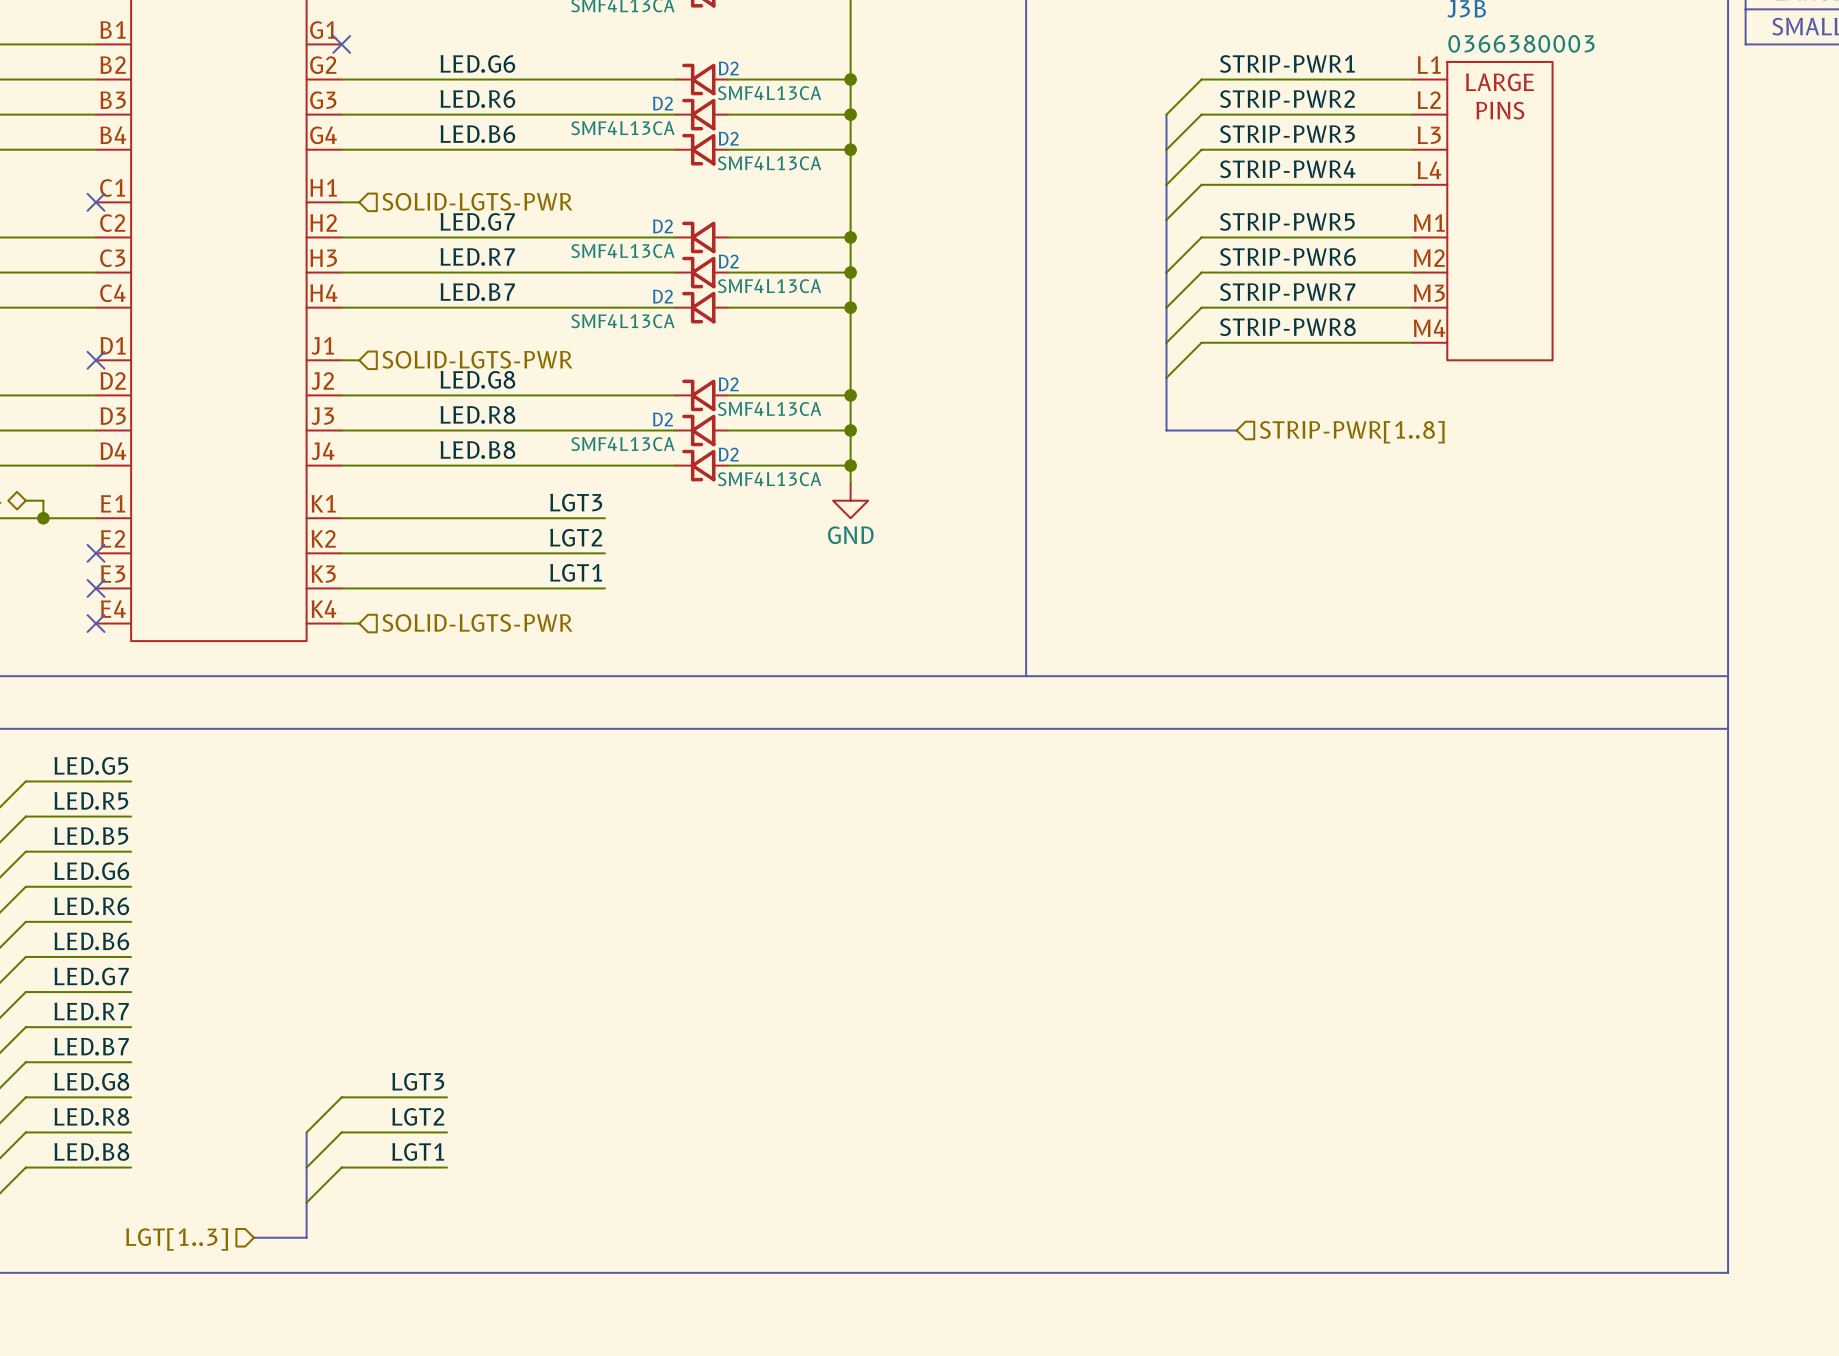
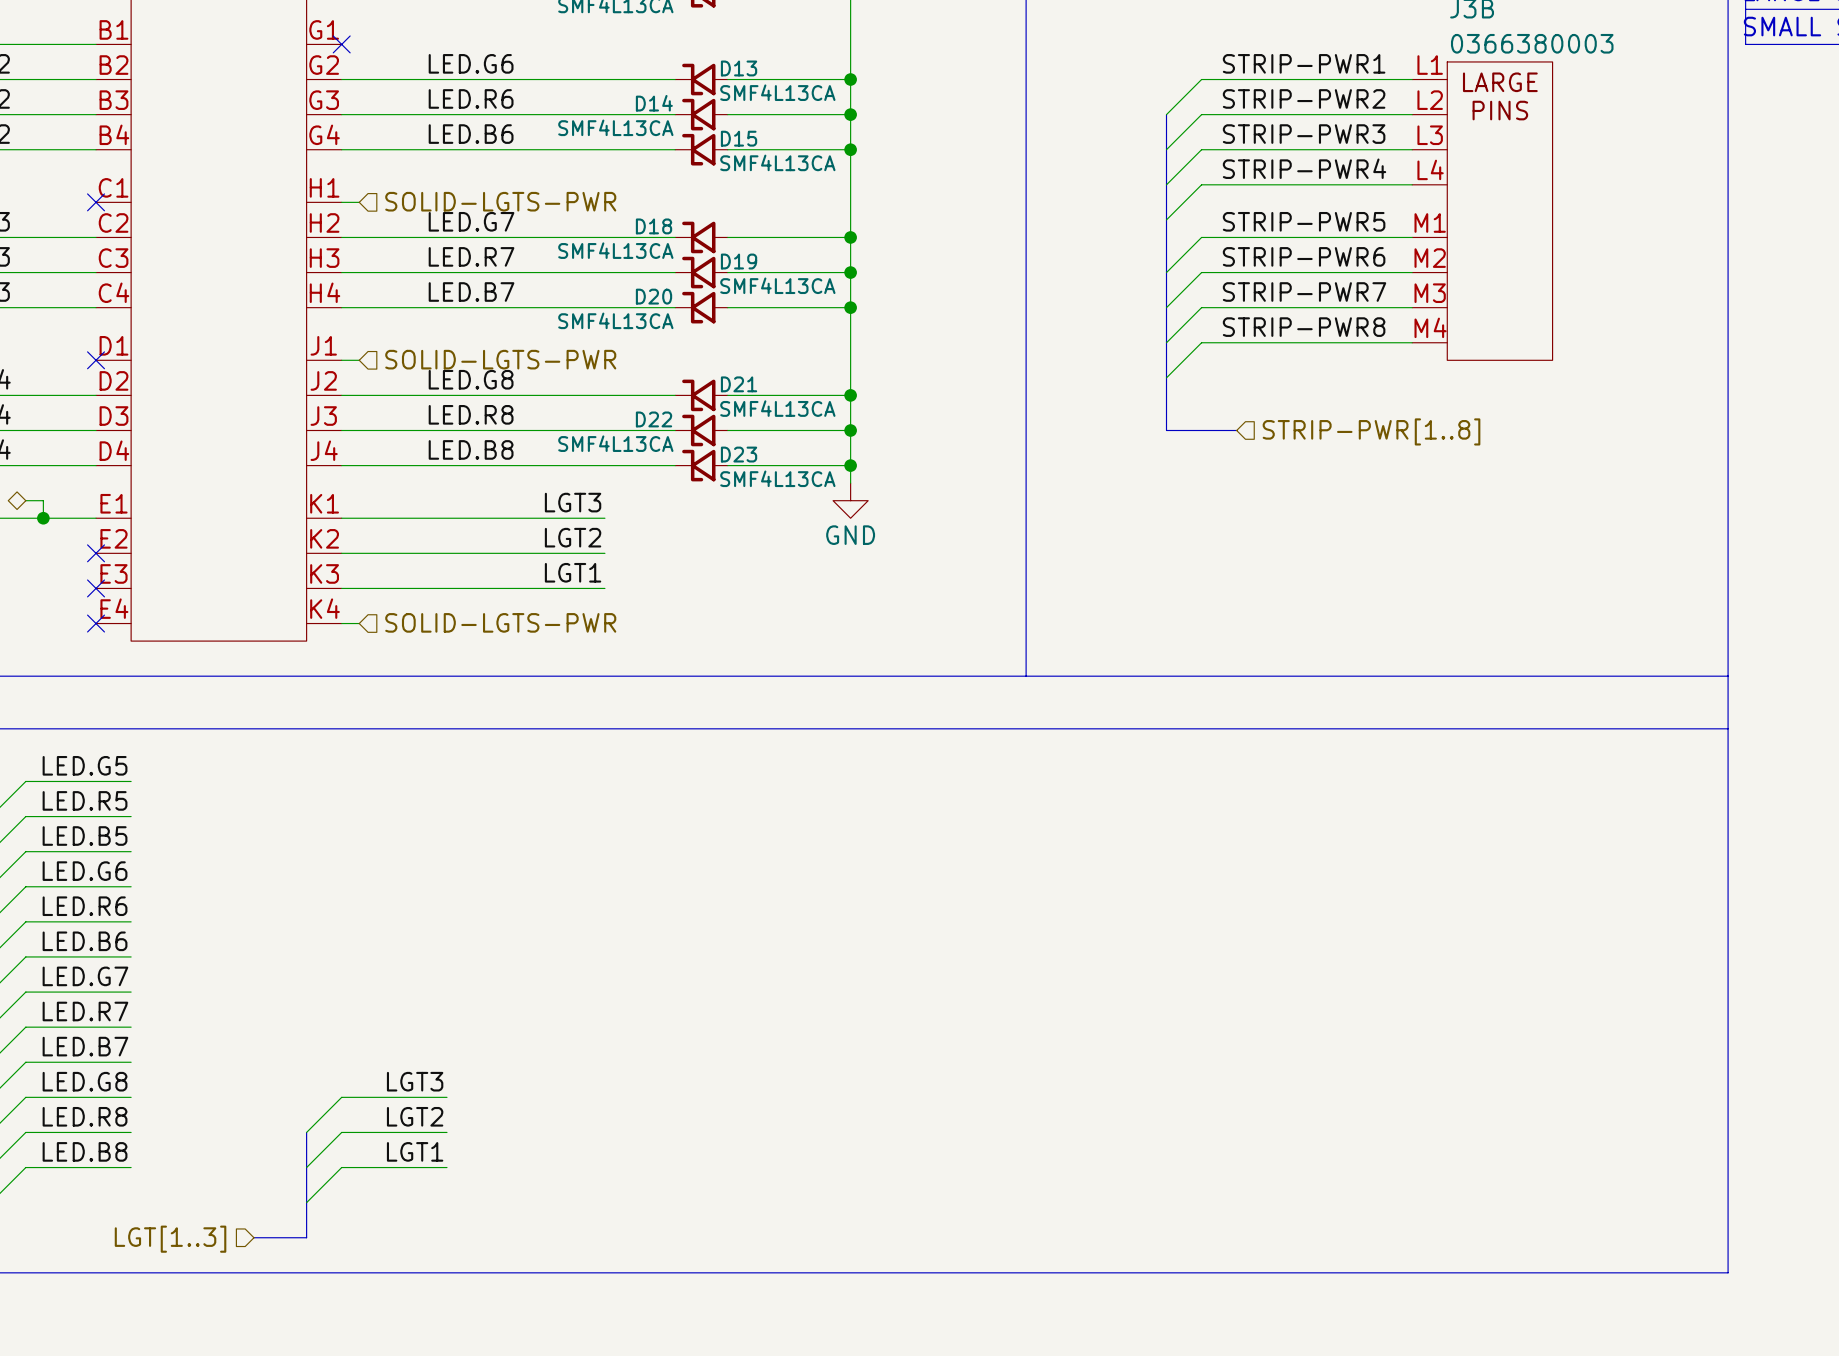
D2 name: D2 (728, 68) -> D13 (739, 68)
D2 name: D2 (662, 103) -> D14 (654, 103)
D2 name: D2 (728, 138) -> D15 (739, 138)
D2 name: D2 (662, 226) -> D18 (654, 226)
D2 name: D2 (728, 261) -> D19 (739, 261)
D2 name: D2 (662, 296) -> D20 (654, 296)
D2 name: D2 (728, 384) -> D21 (739, 384)
D2 name: D2 (662, 419) -> D22 (654, 419)
D2 name: D2 (728, 454) -> D23 (739, 454)

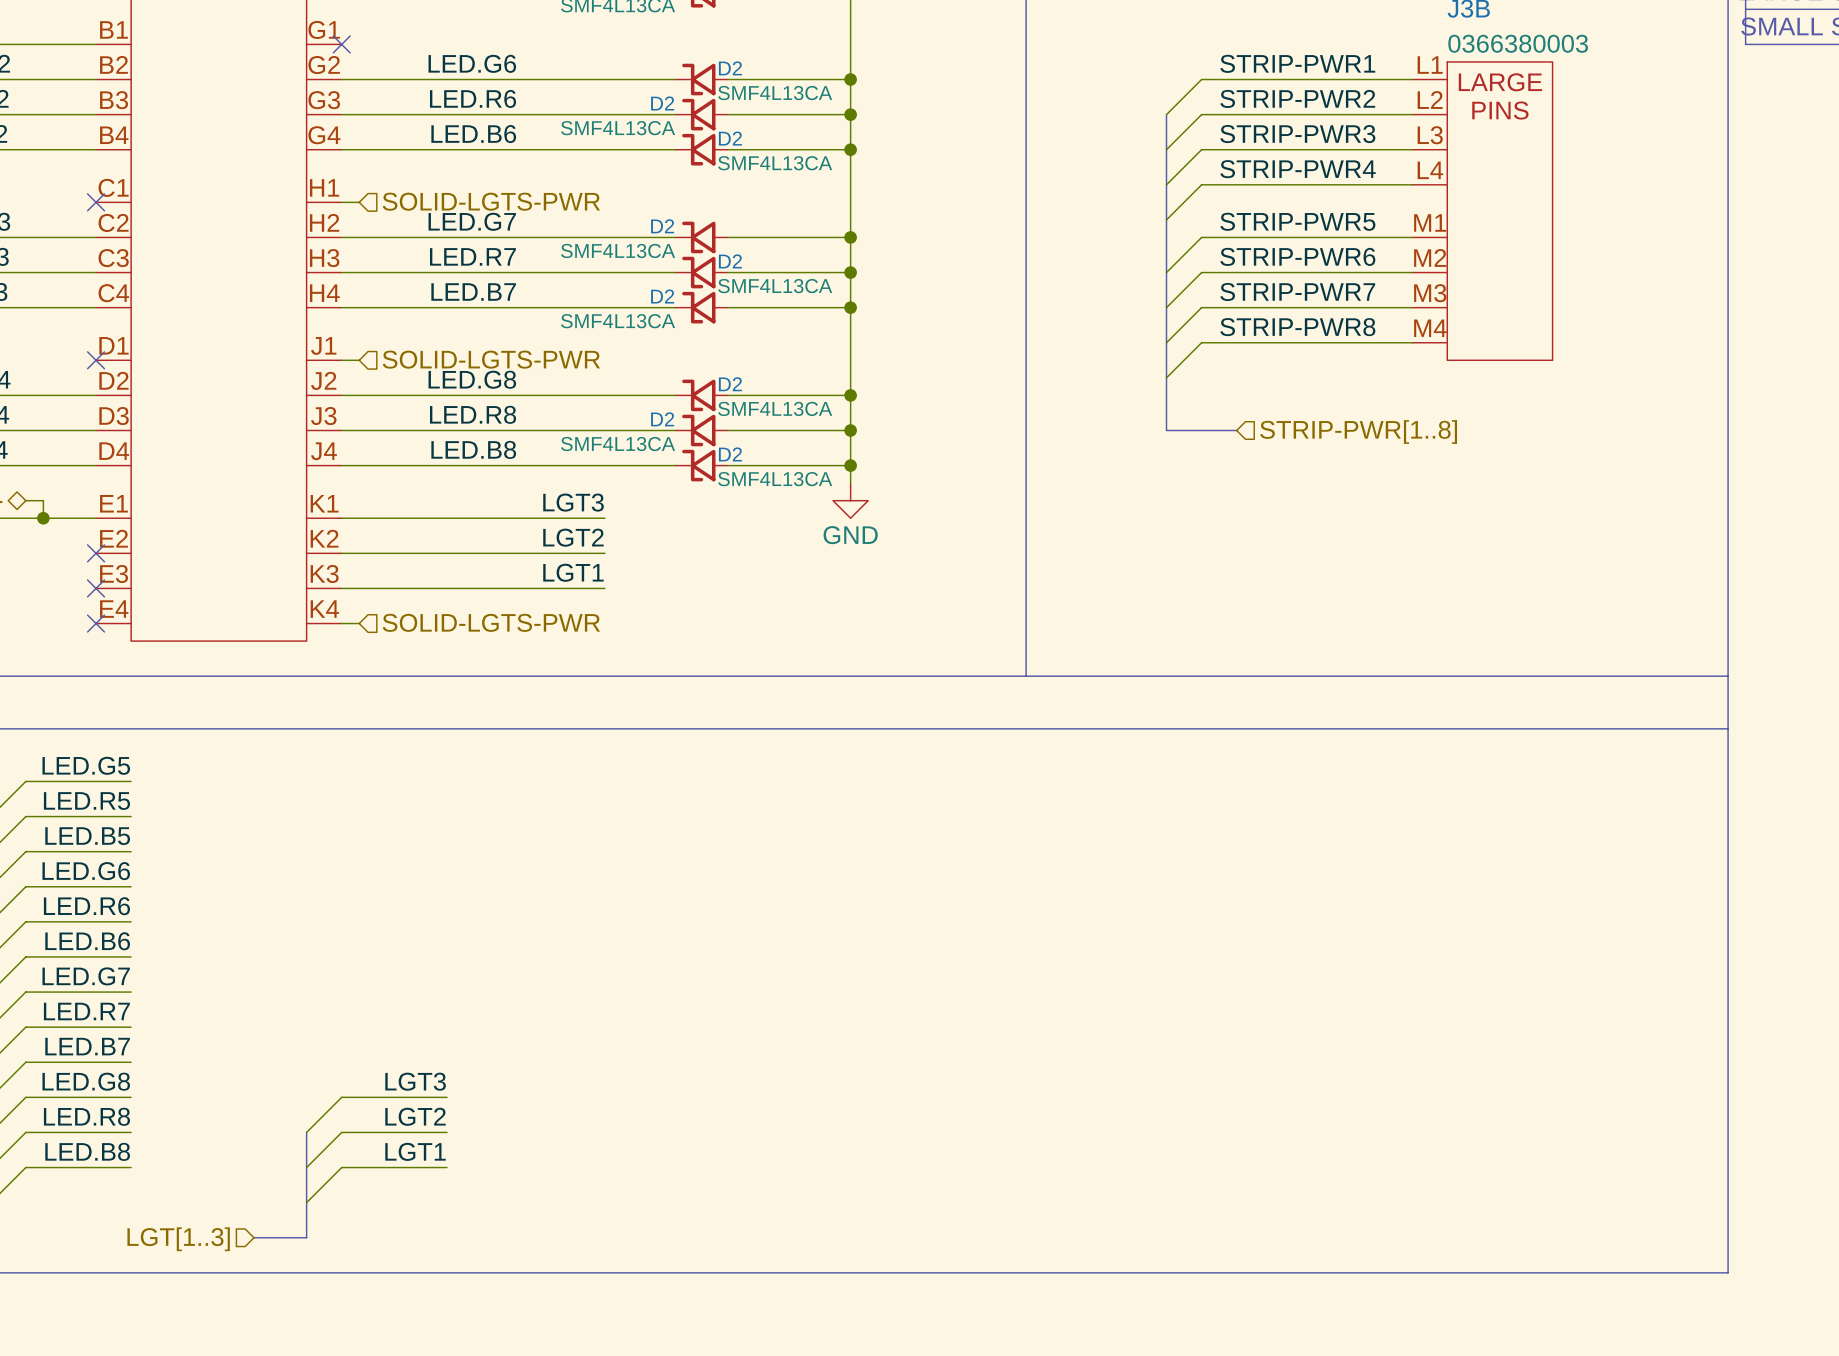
D13 name: D13 (739, 68) -> D2 (730, 68)
D14 name: D14 (654, 103) -> D2 (662, 103)
D15 name: D15 (739, 138) -> D2 (730, 138)
D18 name: D18 (654, 226) -> D2 (662, 226)
D19 name: D19 (739, 261) -> D2 (730, 261)
D20 name: D20 (654, 296) -> D2 (662, 296)
D21 name: D21 (739, 384) -> D2 (730, 384)
D22 name: D22 (654, 419) -> D2 (662, 419)
D23 name: D23 (739, 454) -> D2 (730, 454)

